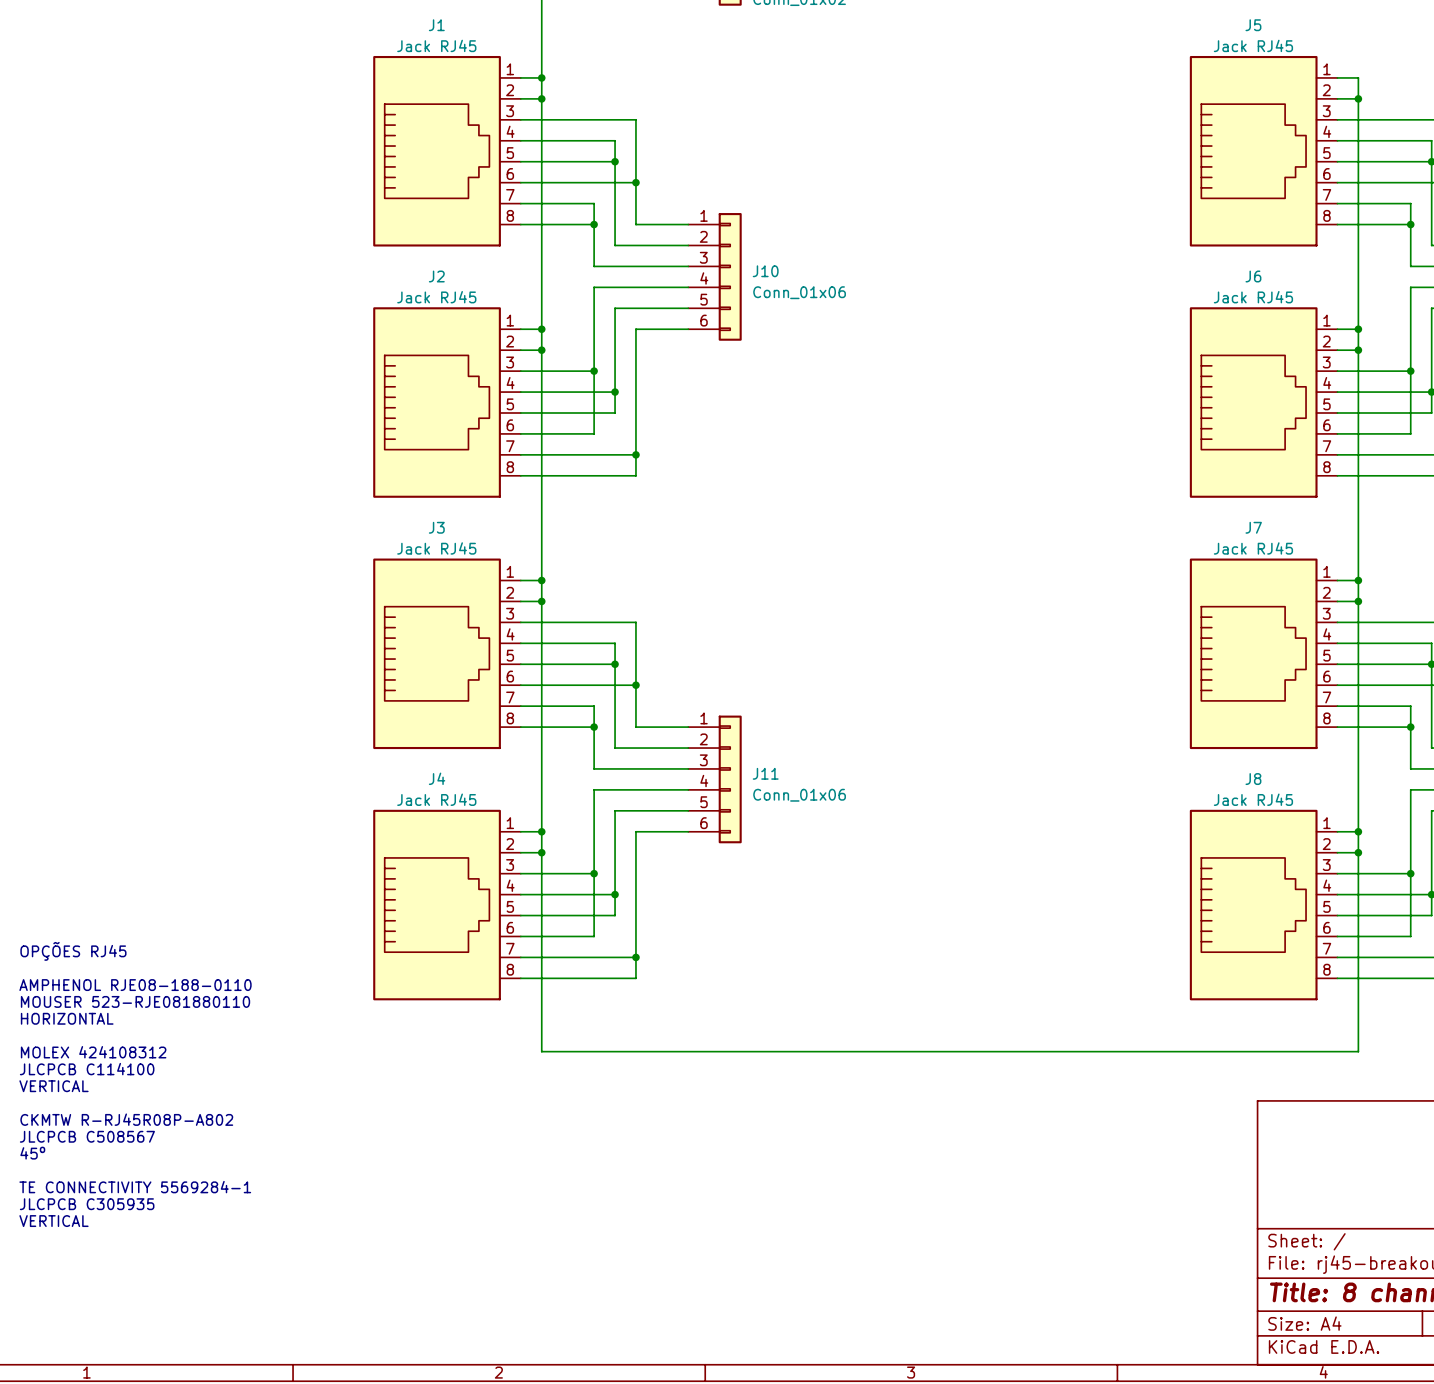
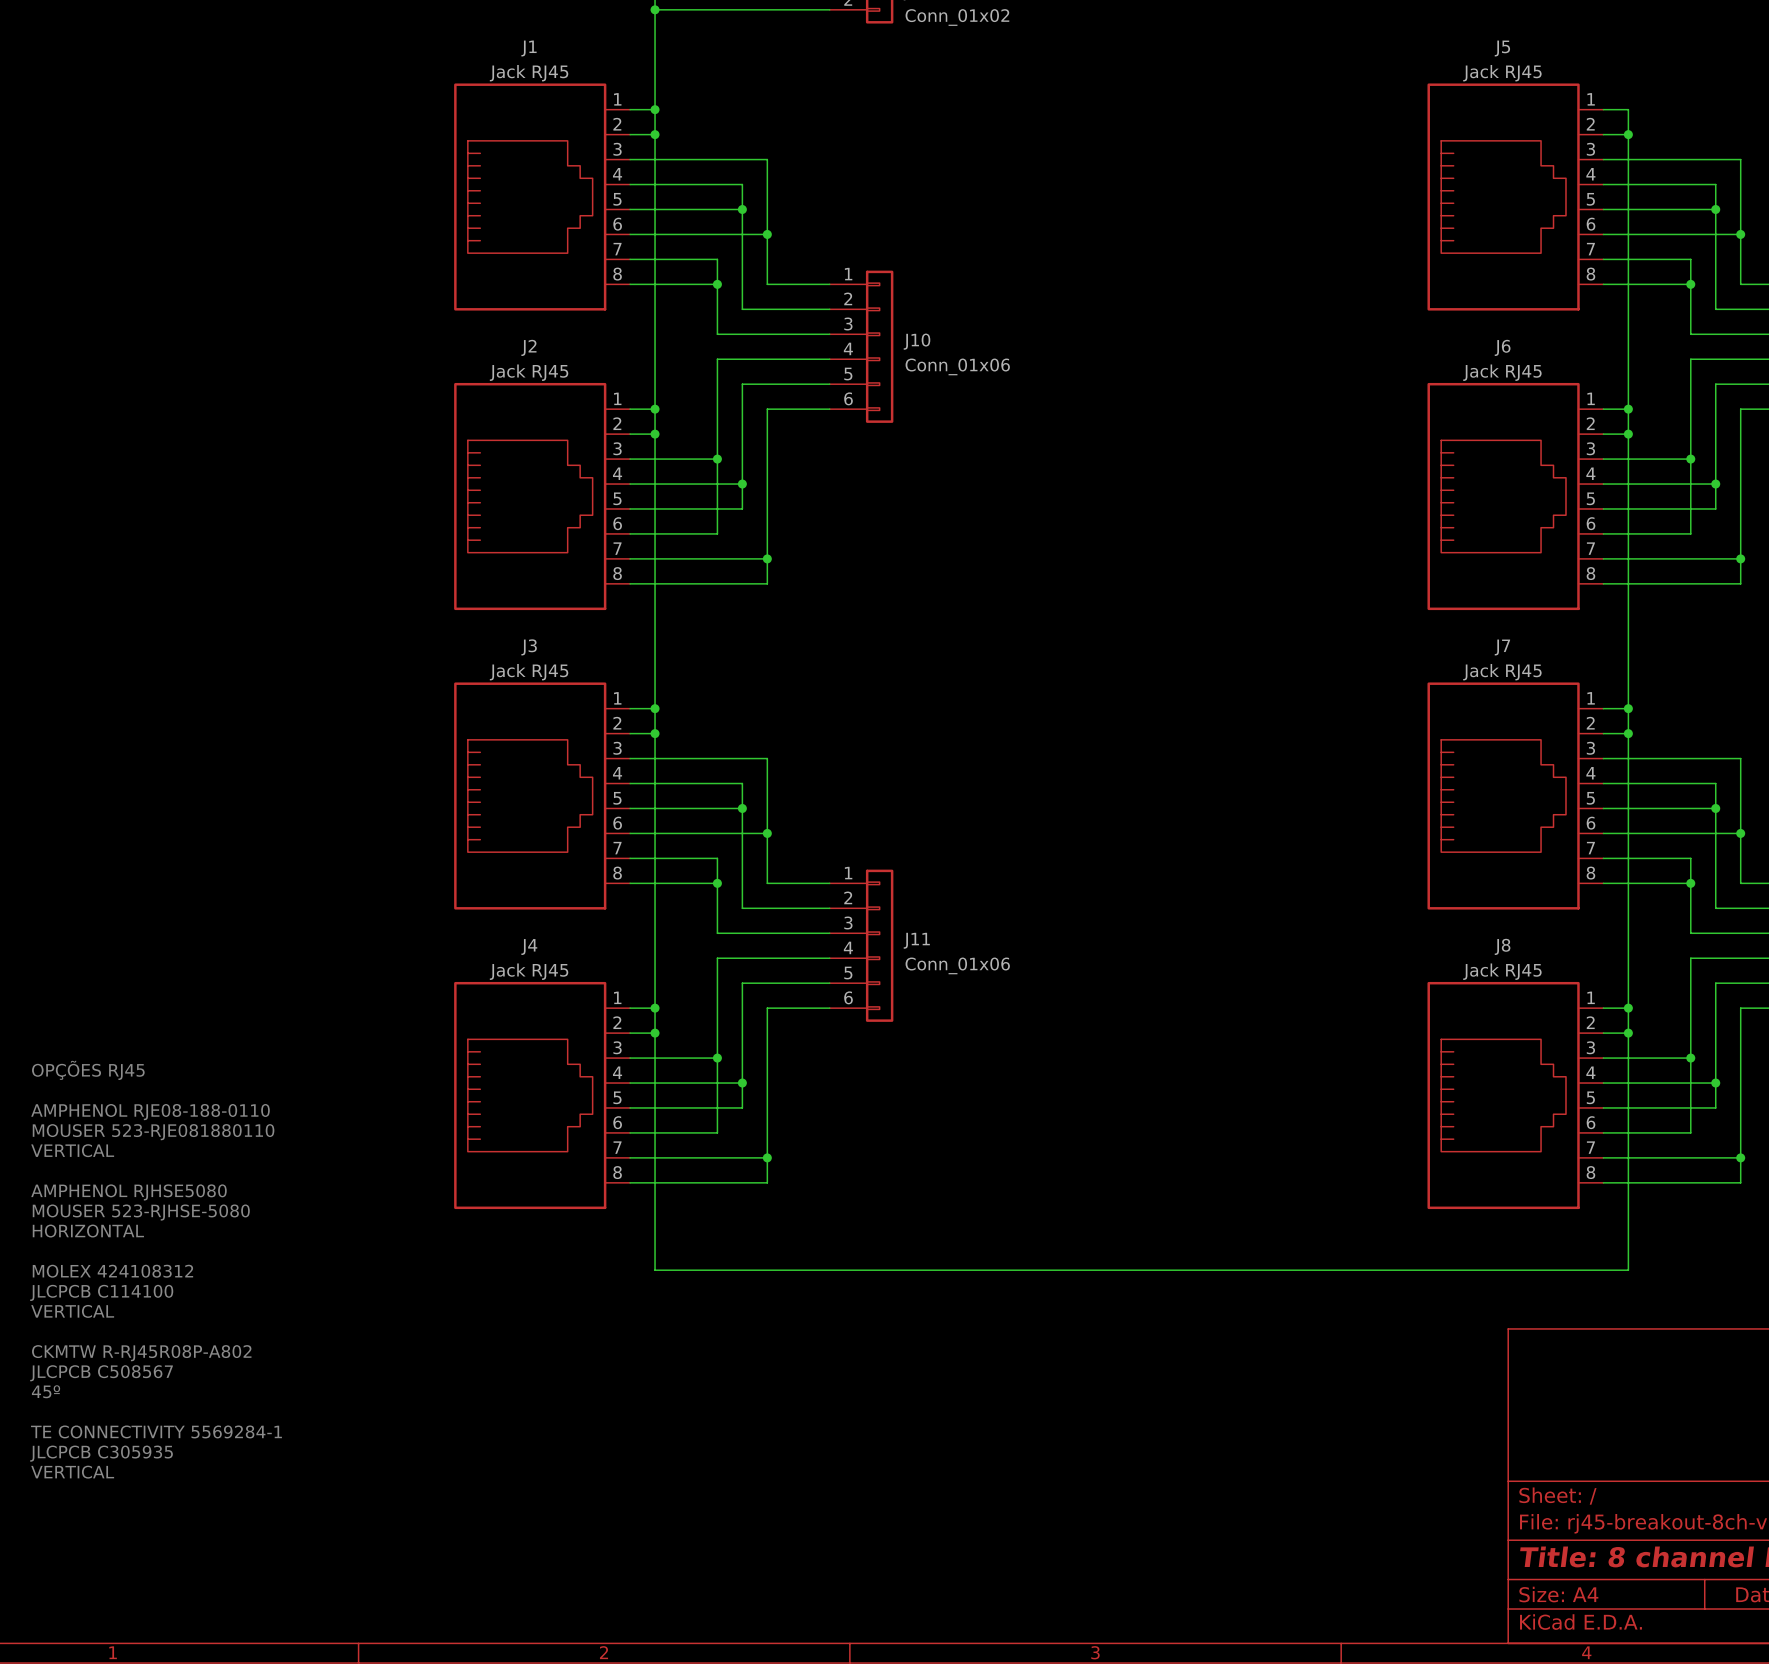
text: none -> OPÇÕES RJ45 (88, 1070)
text: none -> AMPHENOL RJE08-188-0110 (150, 1112)
text: none -> MOUSER 523-RJE081880110 (153, 1132)
text: OPÇÕES RJ45 (73, 951) -> VERTICAL (72, 1150)
text: AMPHENOL RJE08-188-0110 (135, 985) -> AMPHENOL RJHSE5080 (128, 1192)
text: MOUSER 523-RJE081880110 (135, 1001) -> MOUSER 523-RJHSE-5080 (141, 1212)

